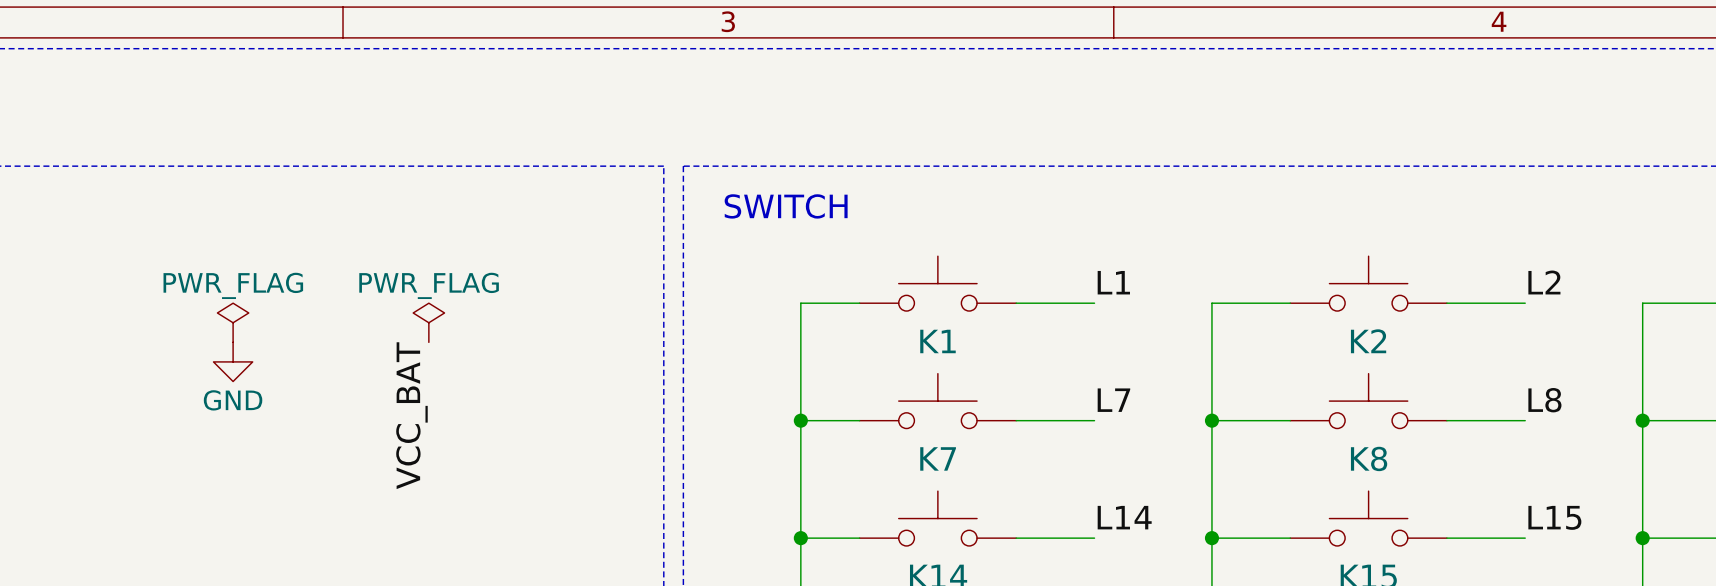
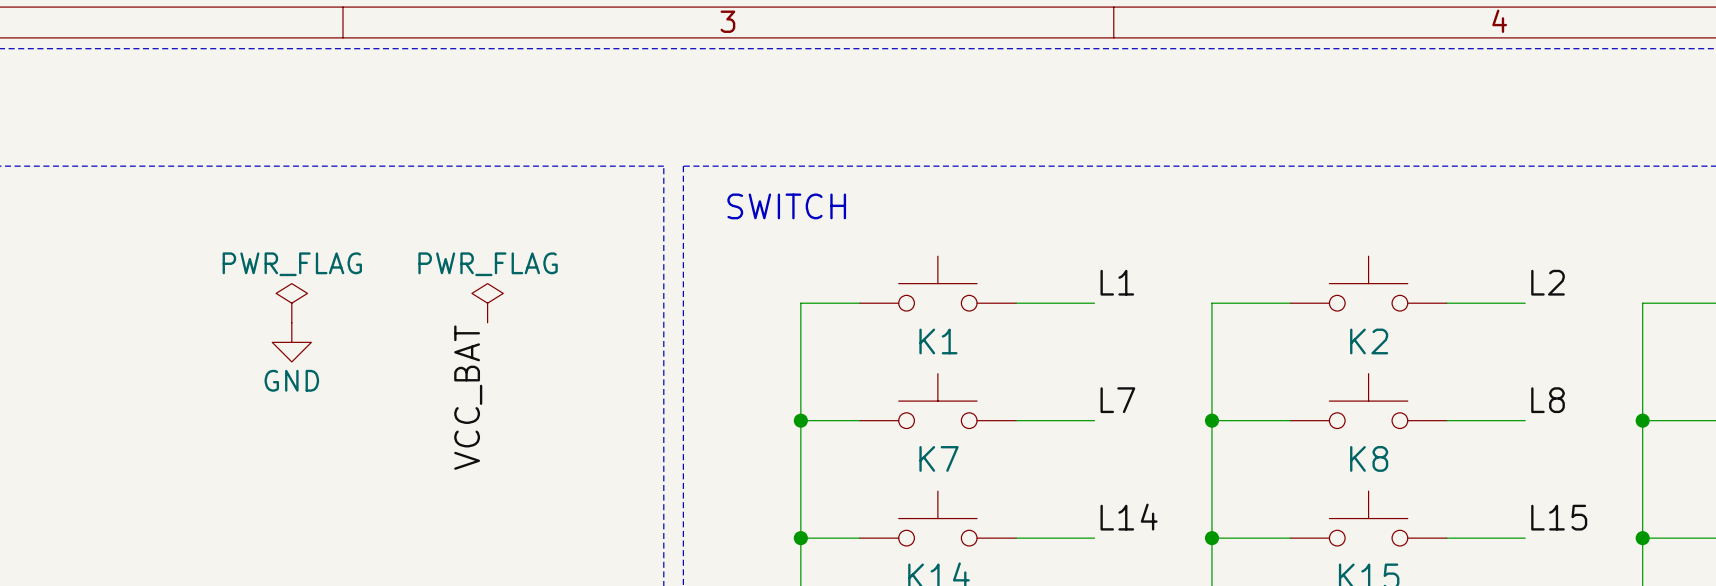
power symbol position: PWR_FLAG (233, 322) -> PWR_FLAG (291, 303)
power symbol position: PWR_FLAG (428, 322) -> PWR_FLAG (487, 303)
power symbol position: GND (233, 361) -> GND (291, 342)
label position: VCC_BAT (411, 415) -> VCC_BAT (468, 397)

